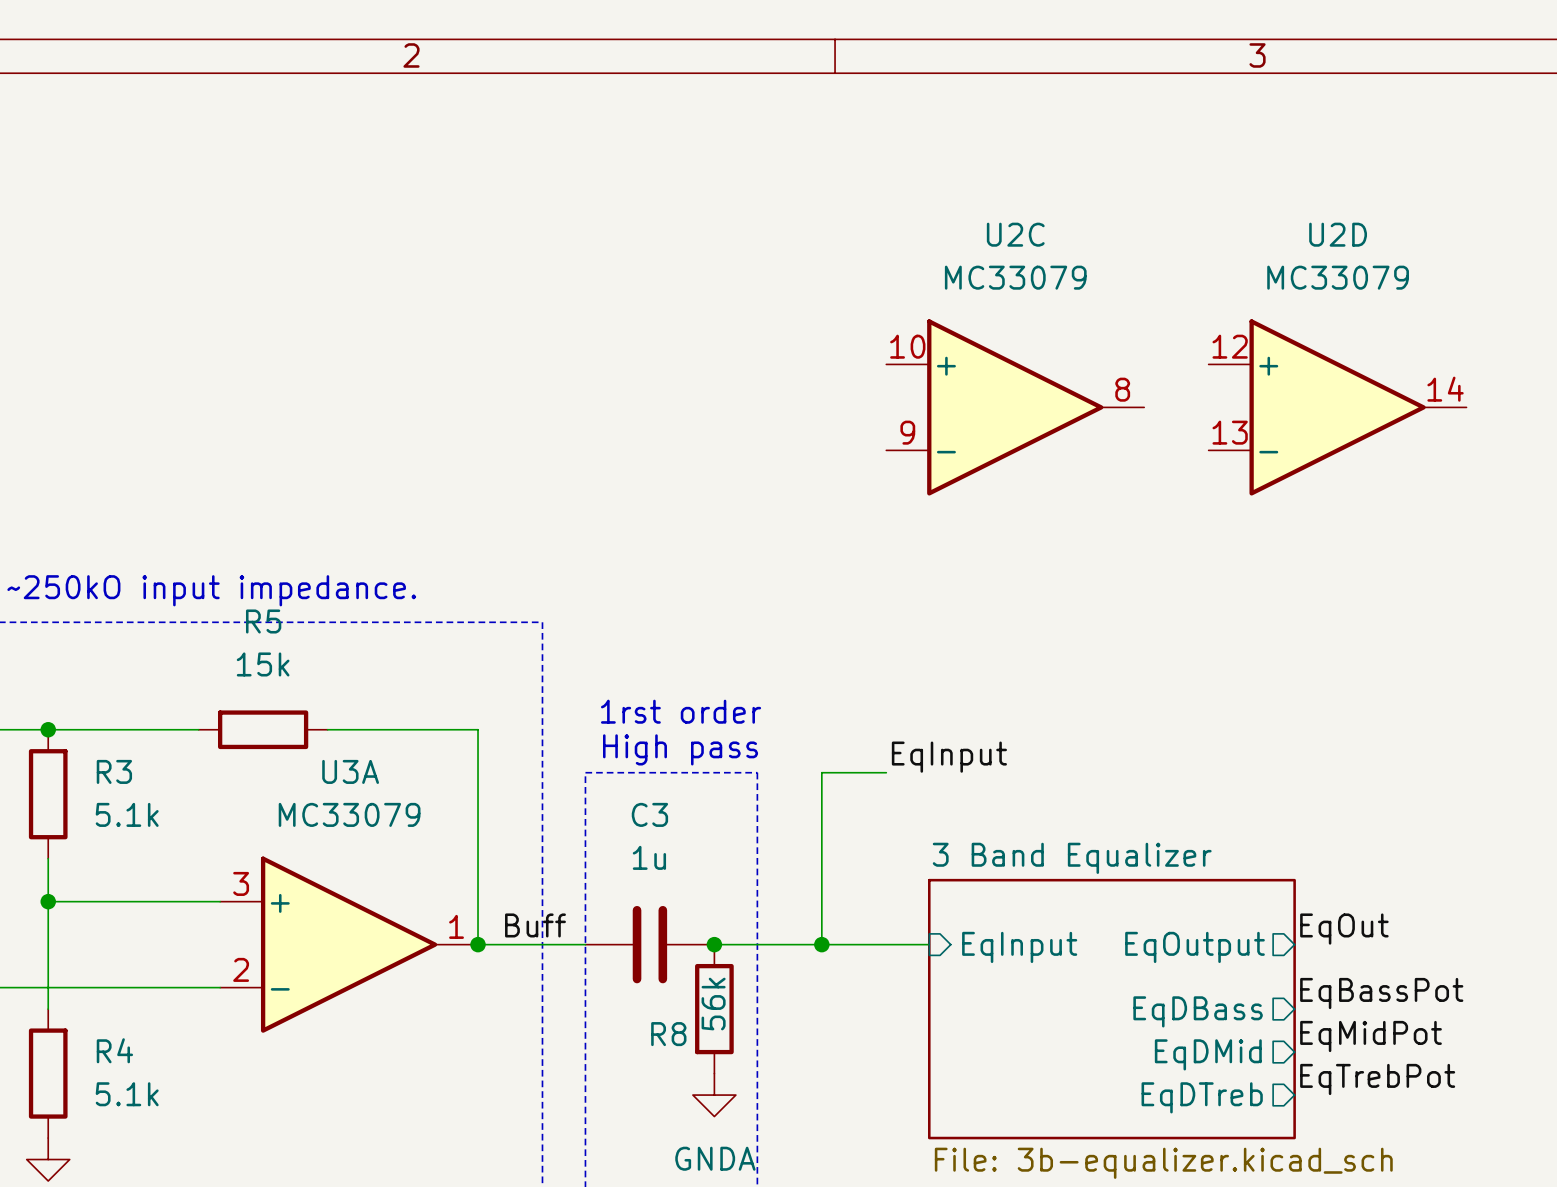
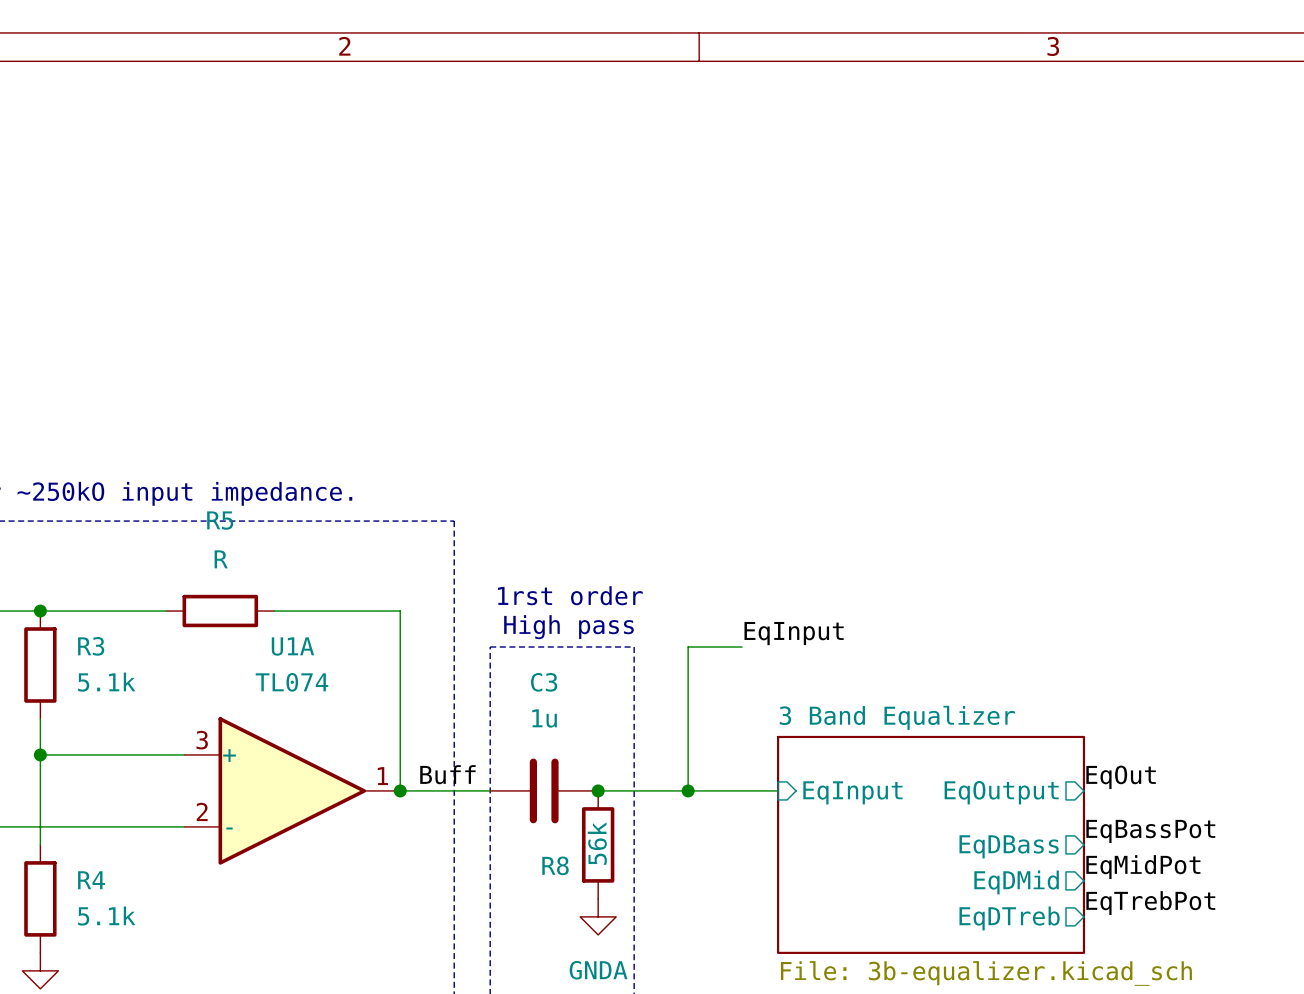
U2C: MC33079 (1015, 407) -> none
U2D: MC33079 (1337, 407) -> none
R5 value: 15k (263, 664) -> R (221, 559)
U3A name: U3A (350, 771) -> U1A (292, 646)
U3A value: MC33079 (349, 814) -> TL074 (291, 682)

